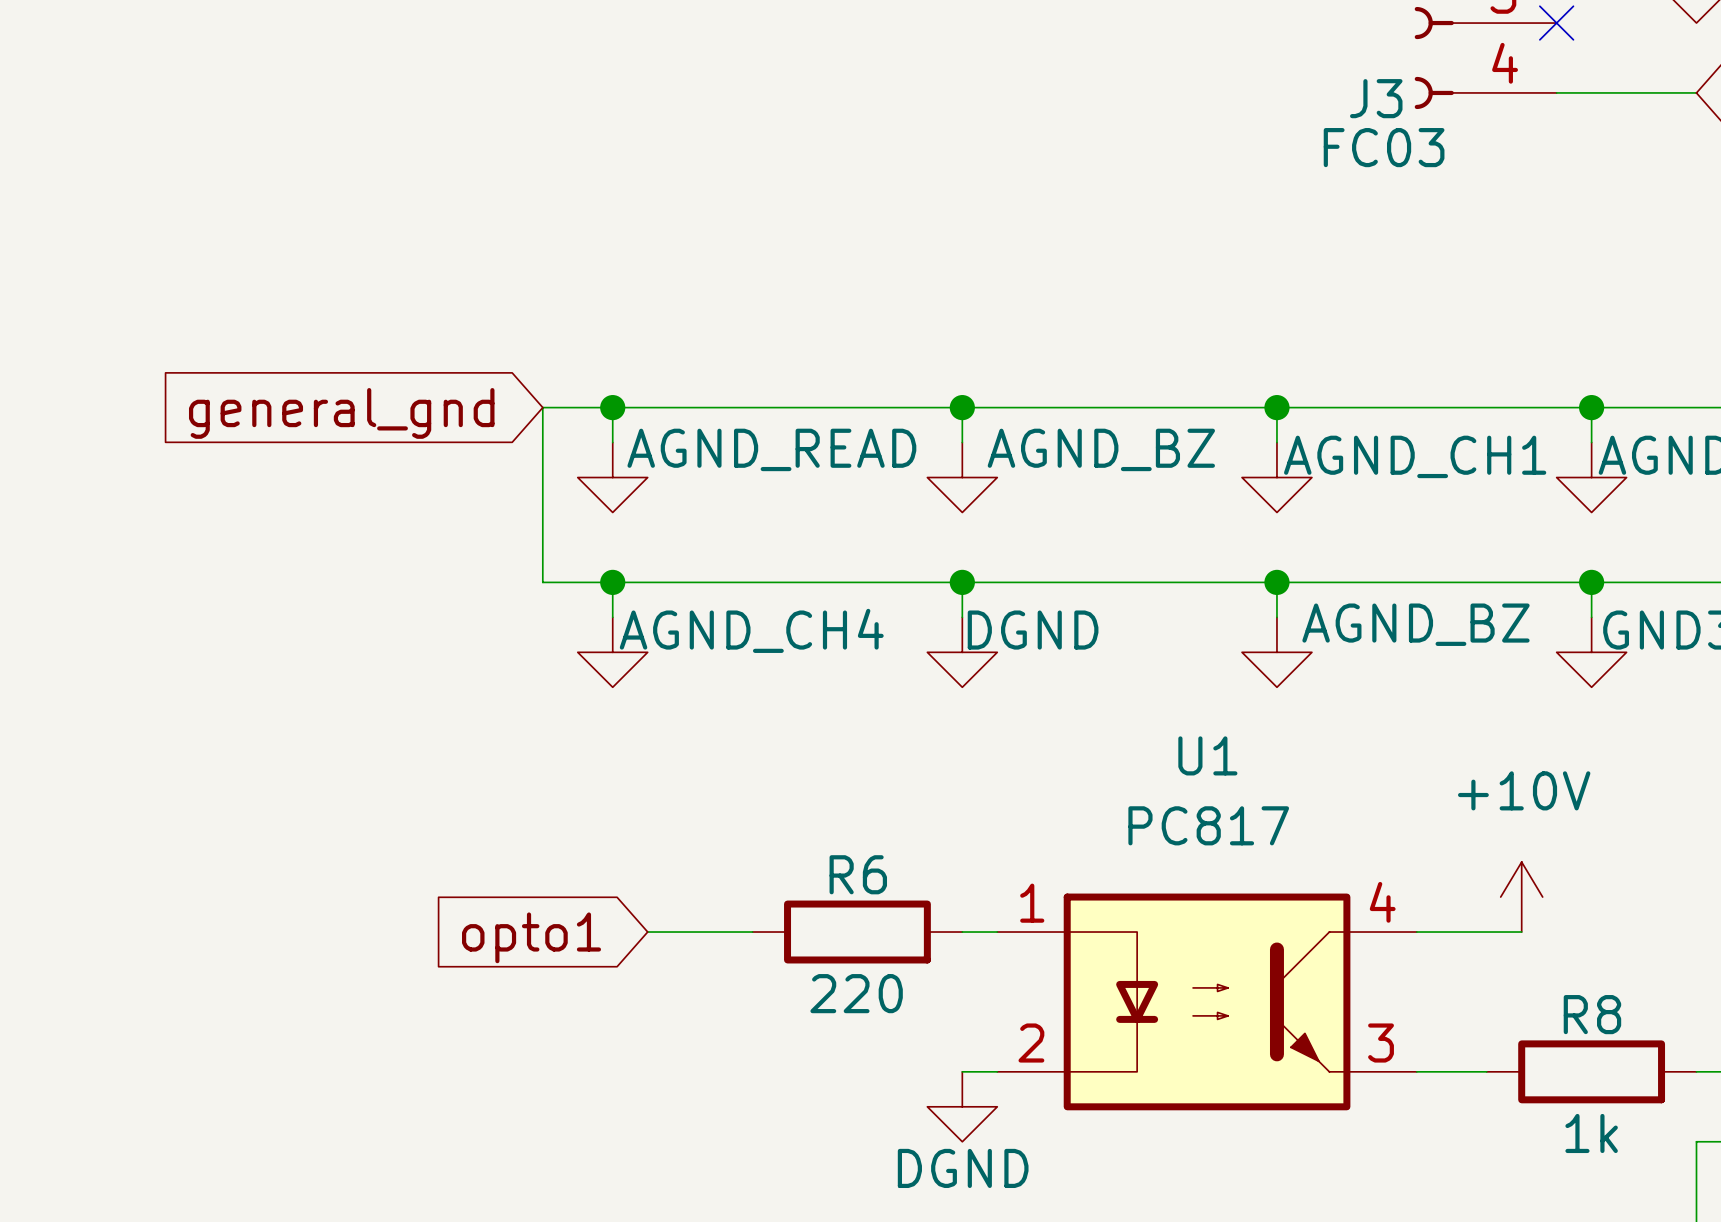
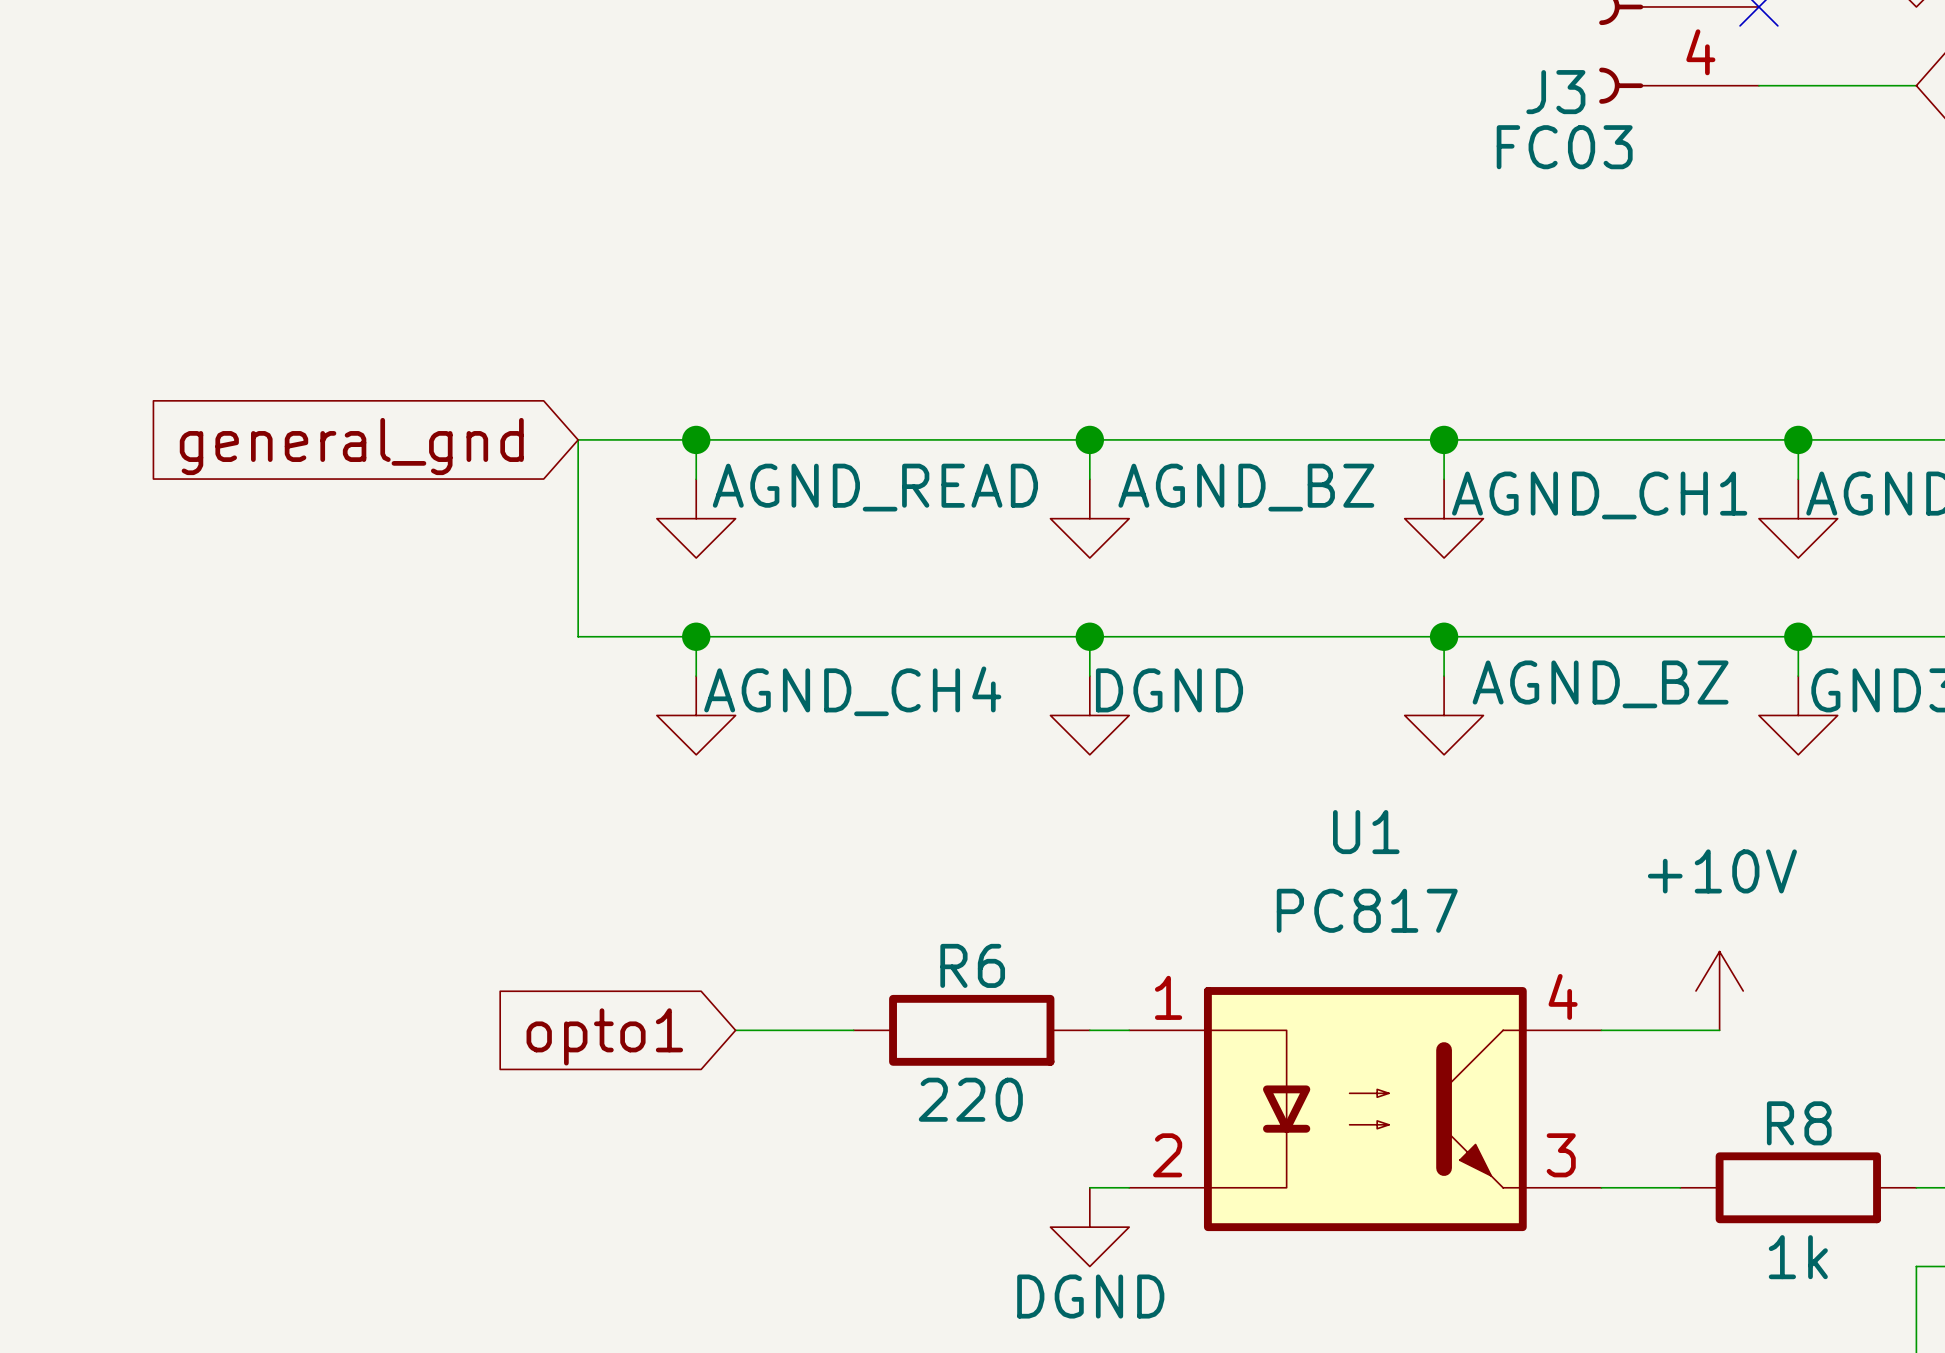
wire: (542, 407) (542, 582) -> (617, 439) (578, 439) (578, 636) (617, 636)
global label position: general_gnd (341, 413) -> general_gnd (351, 446)

